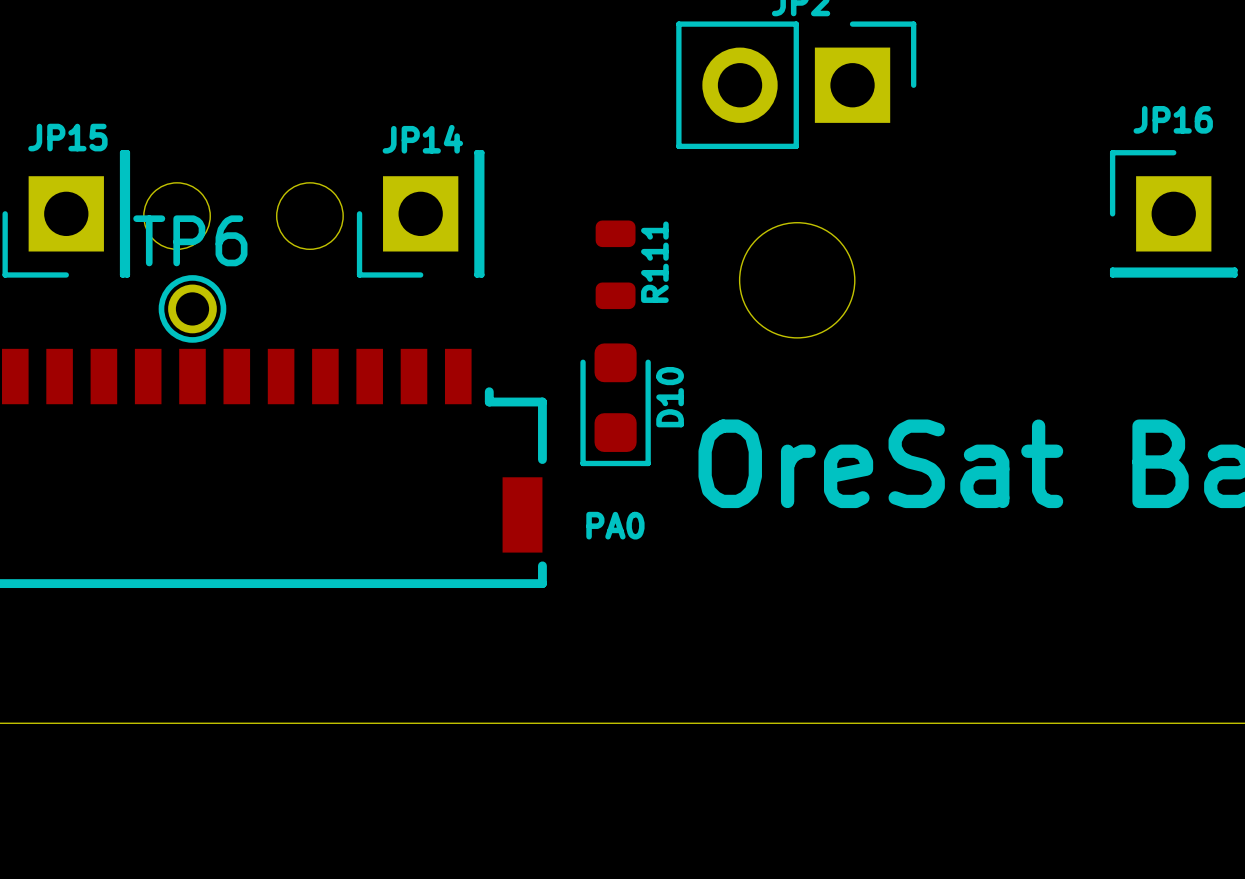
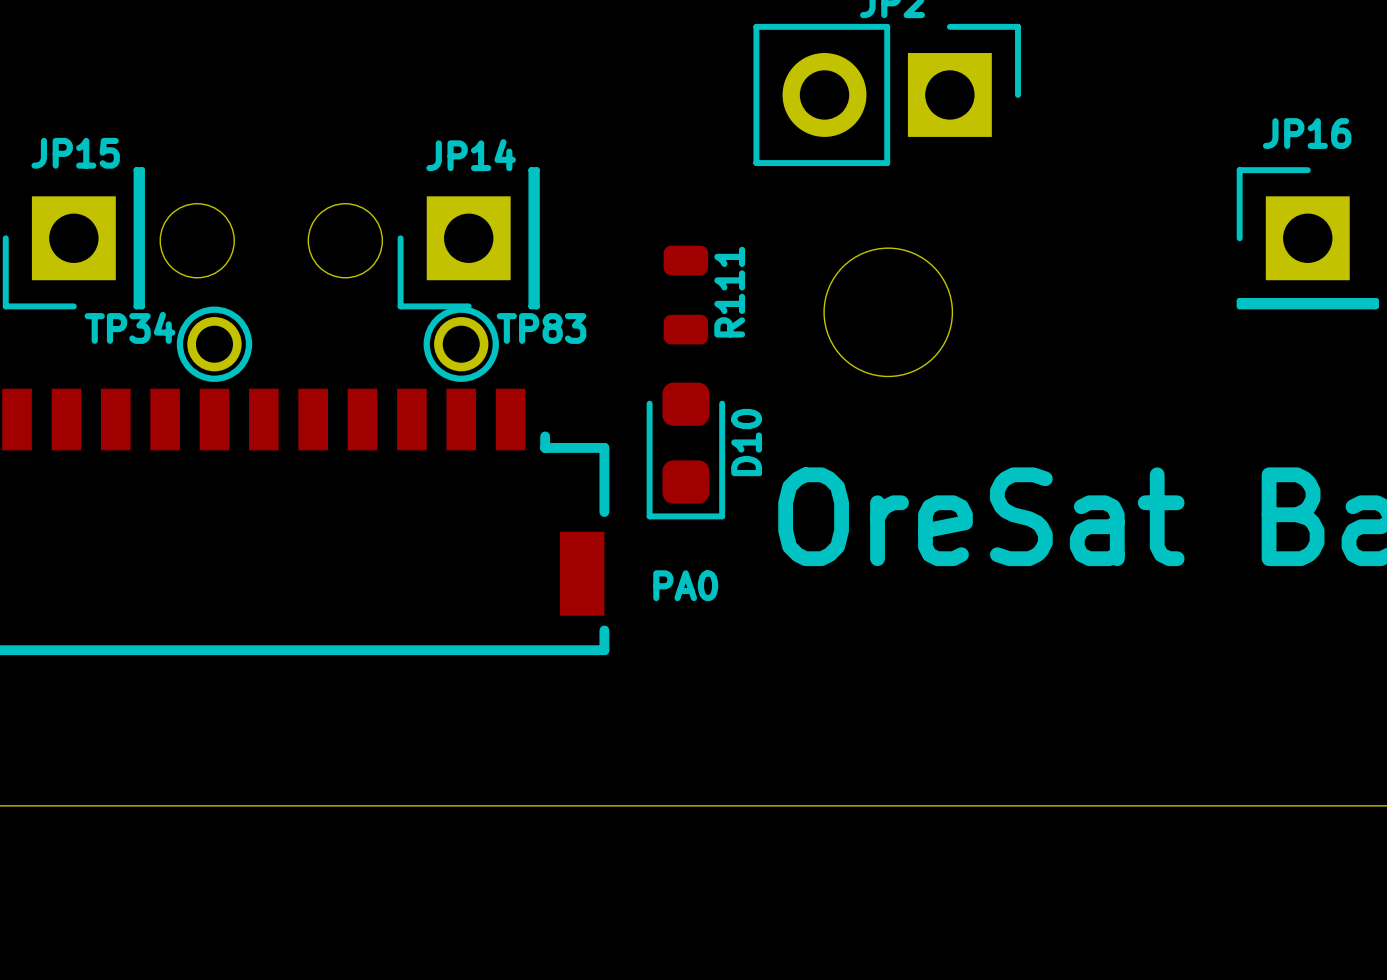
TP6 name: TP6 (190, 240) -> TP34 (129, 327)
TP83: none -> (461, 344)

